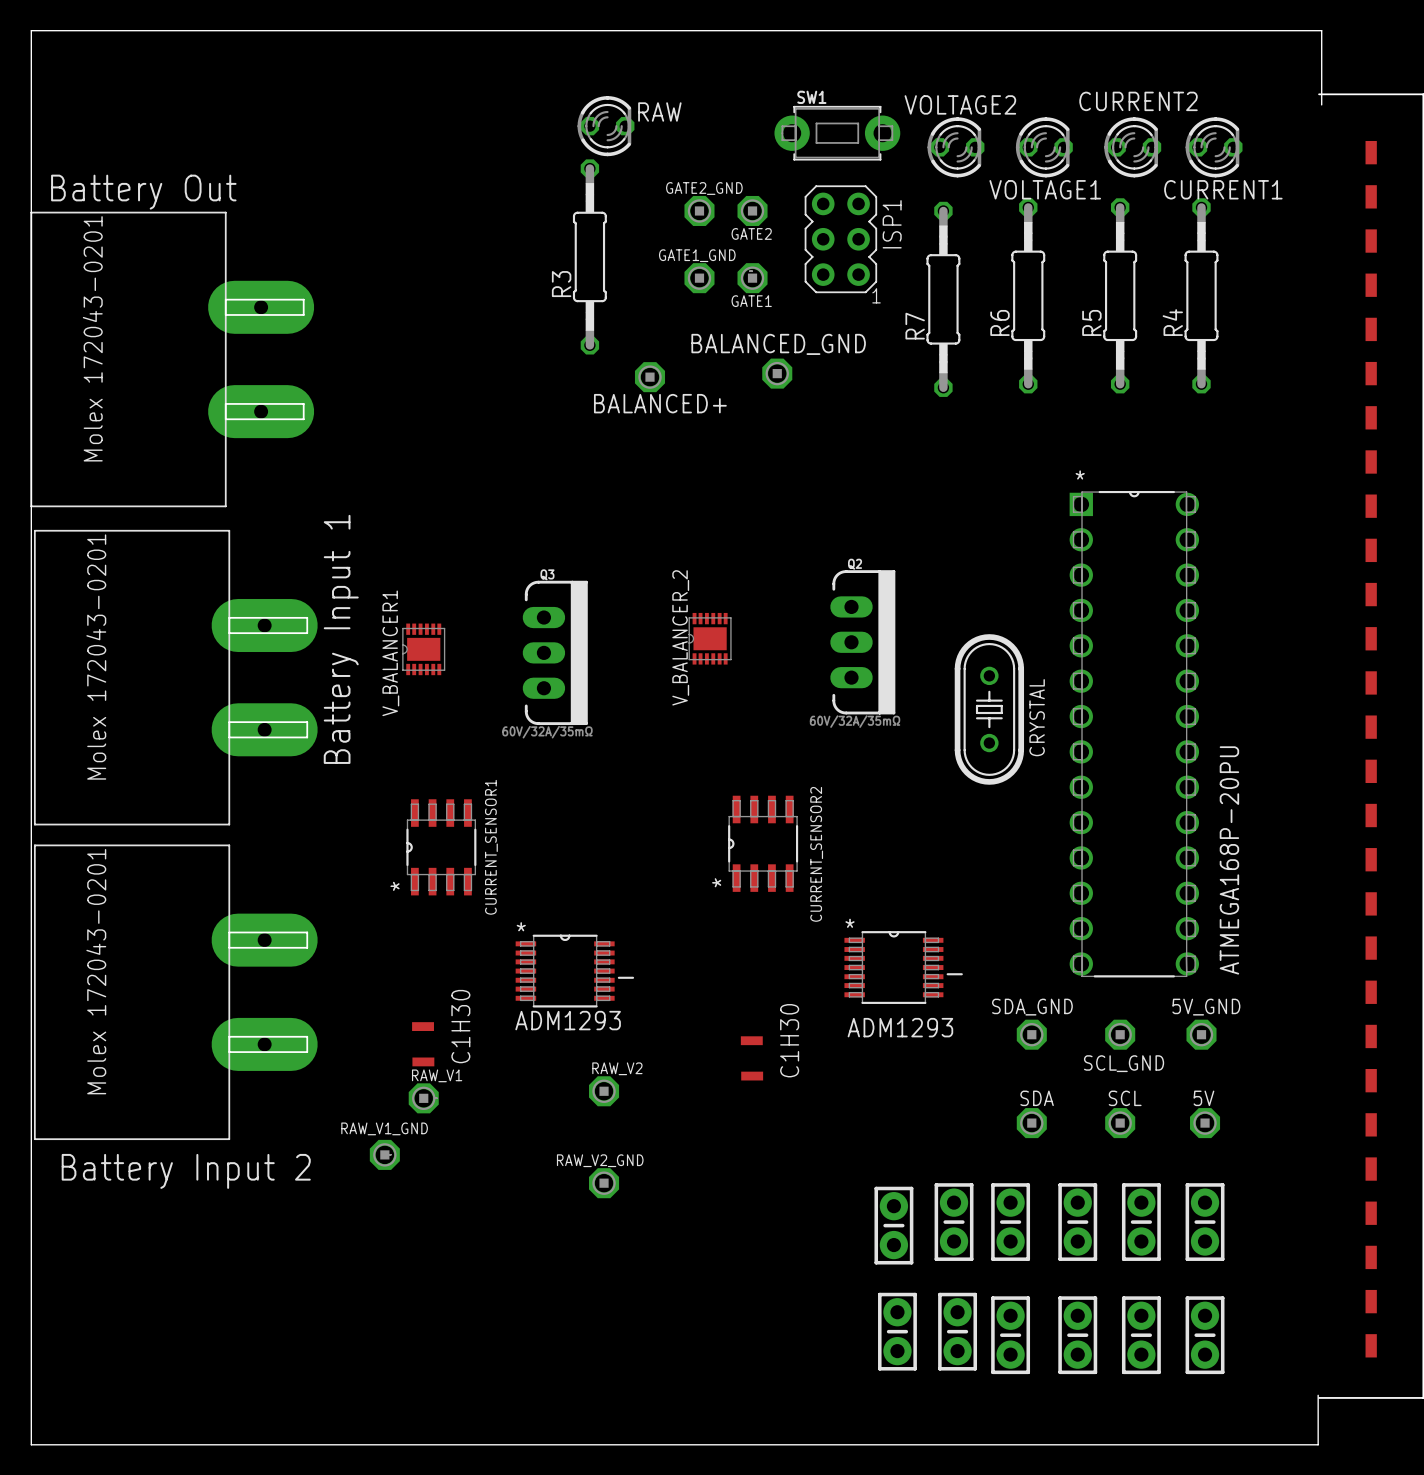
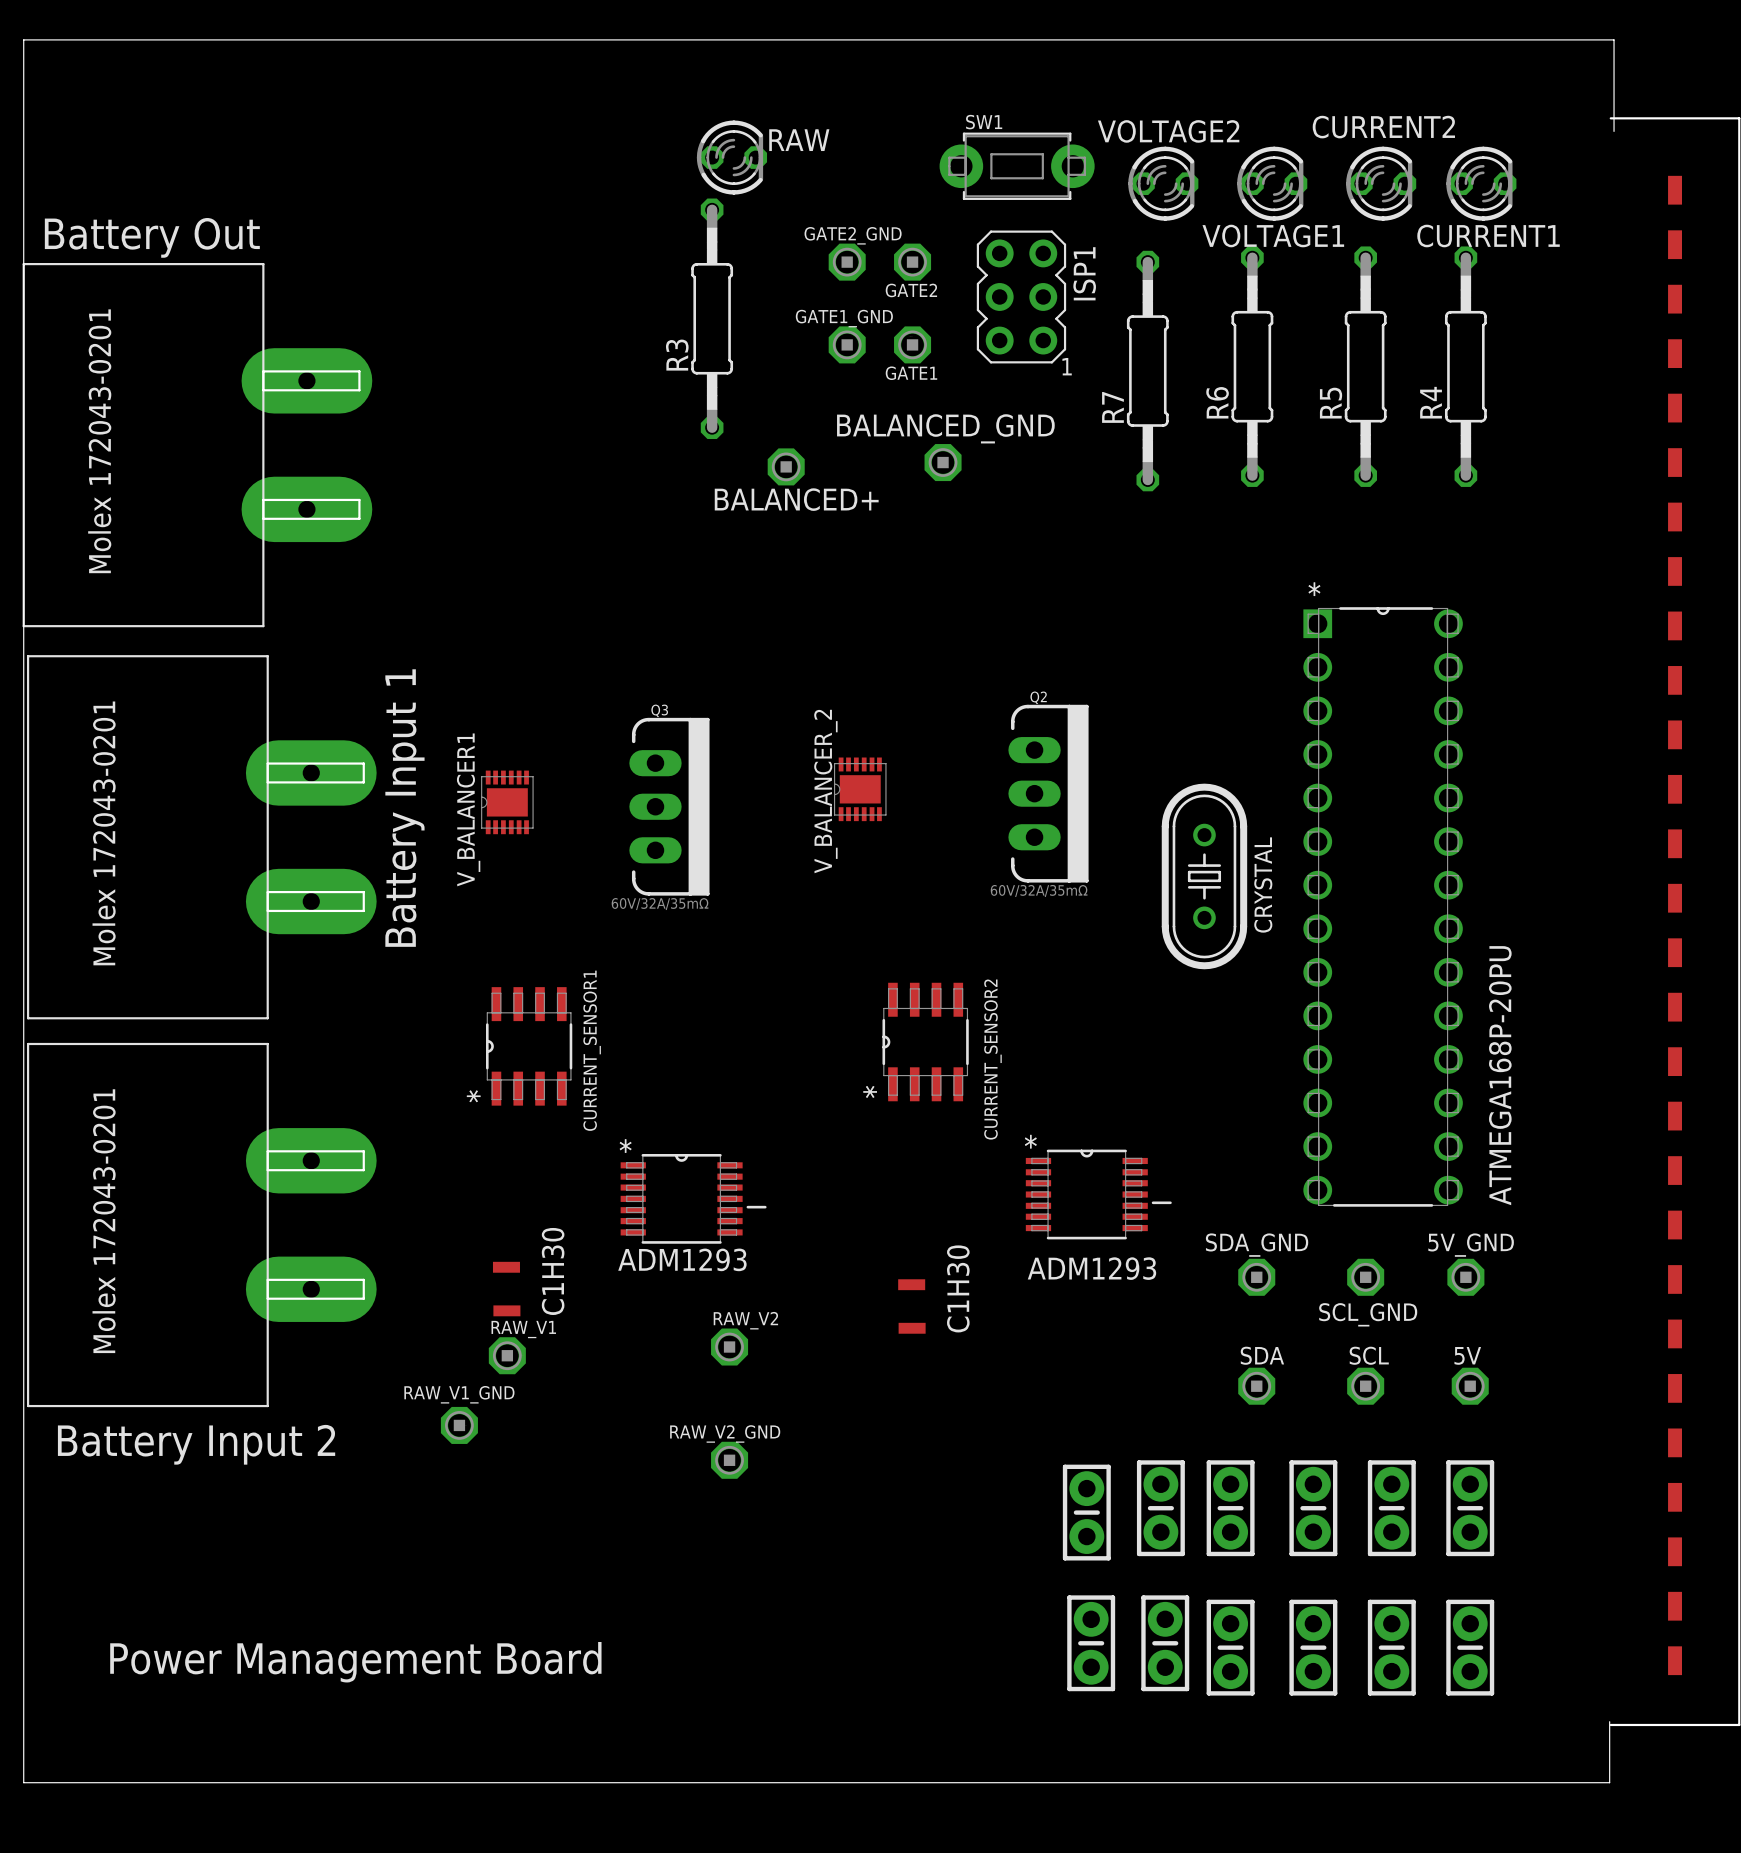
text: none -> Power Management Board (355, 1662)

